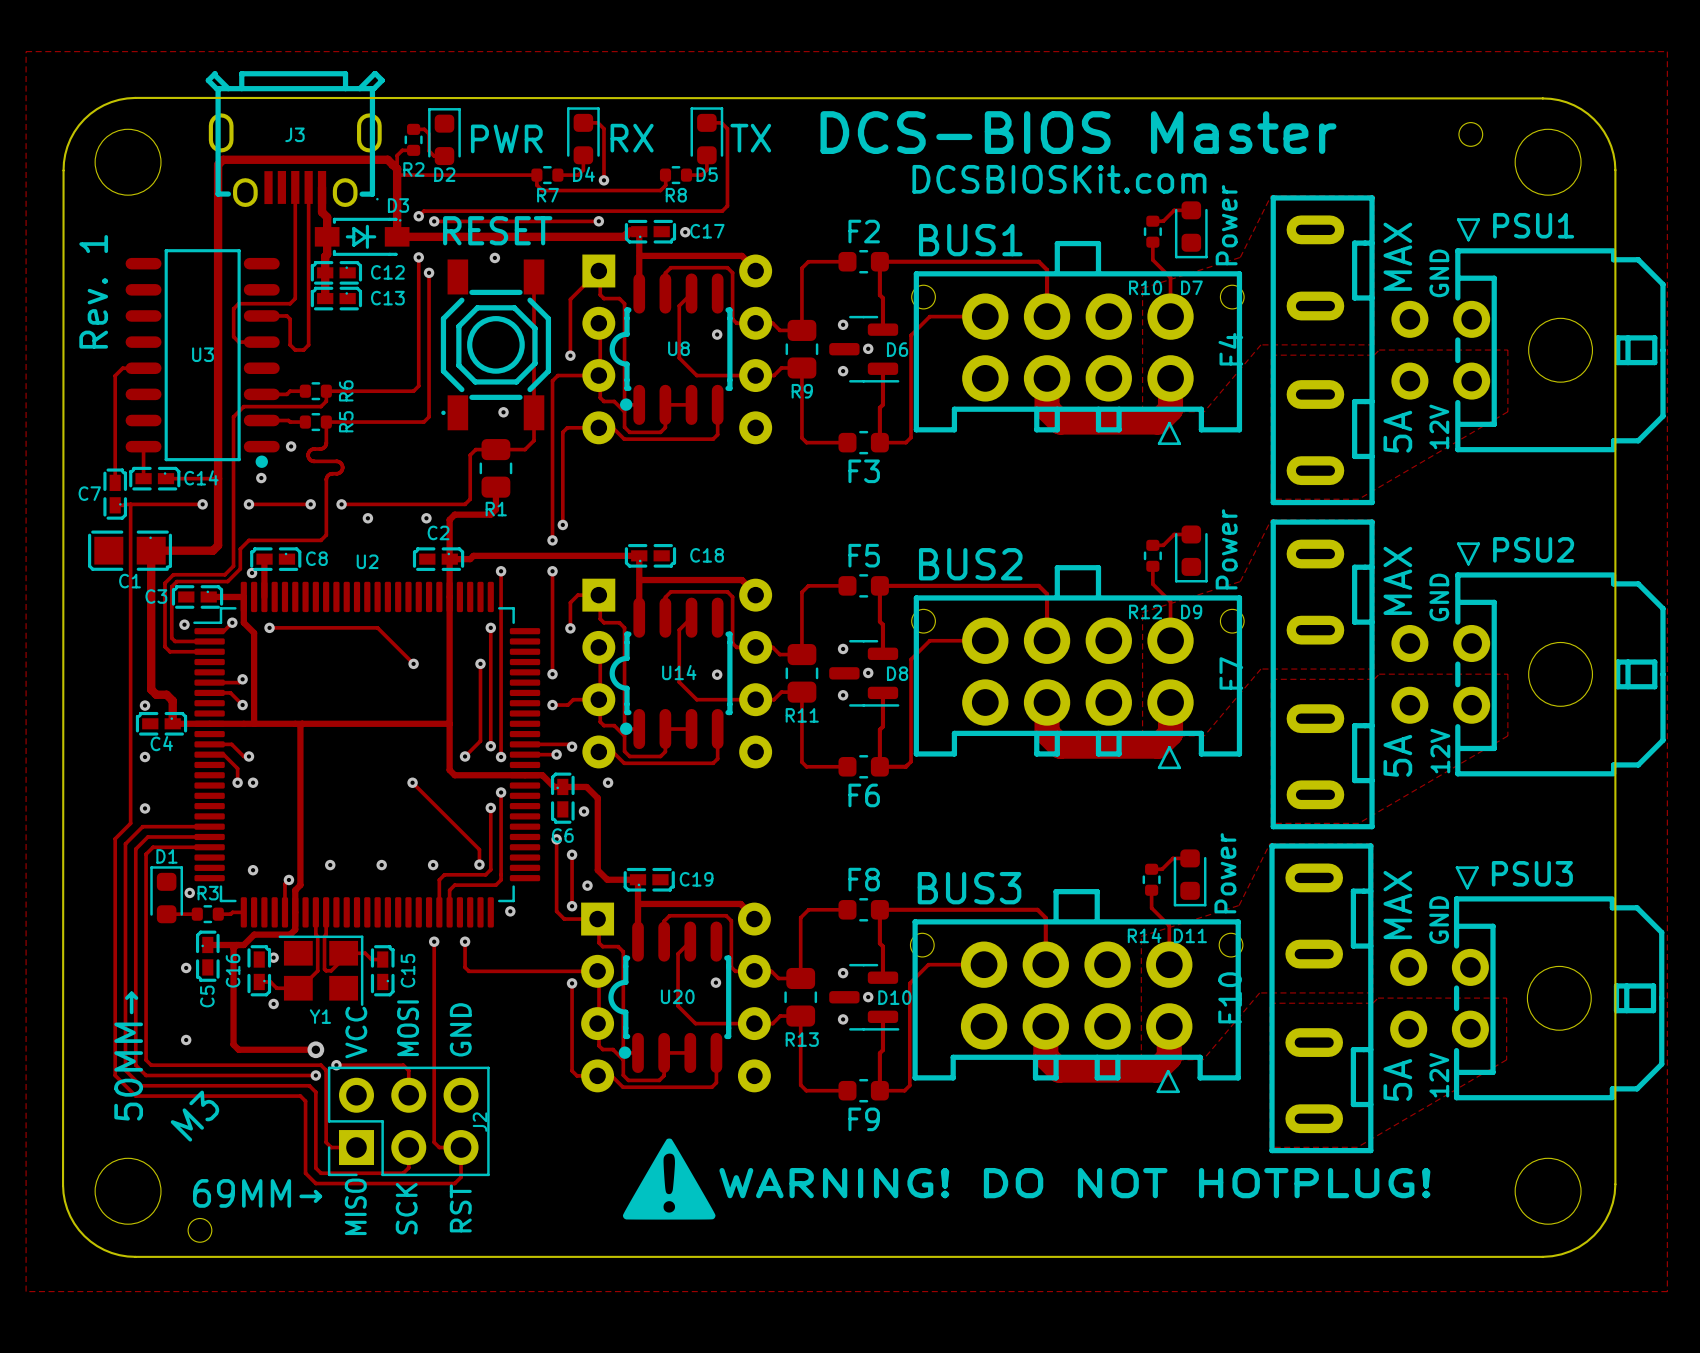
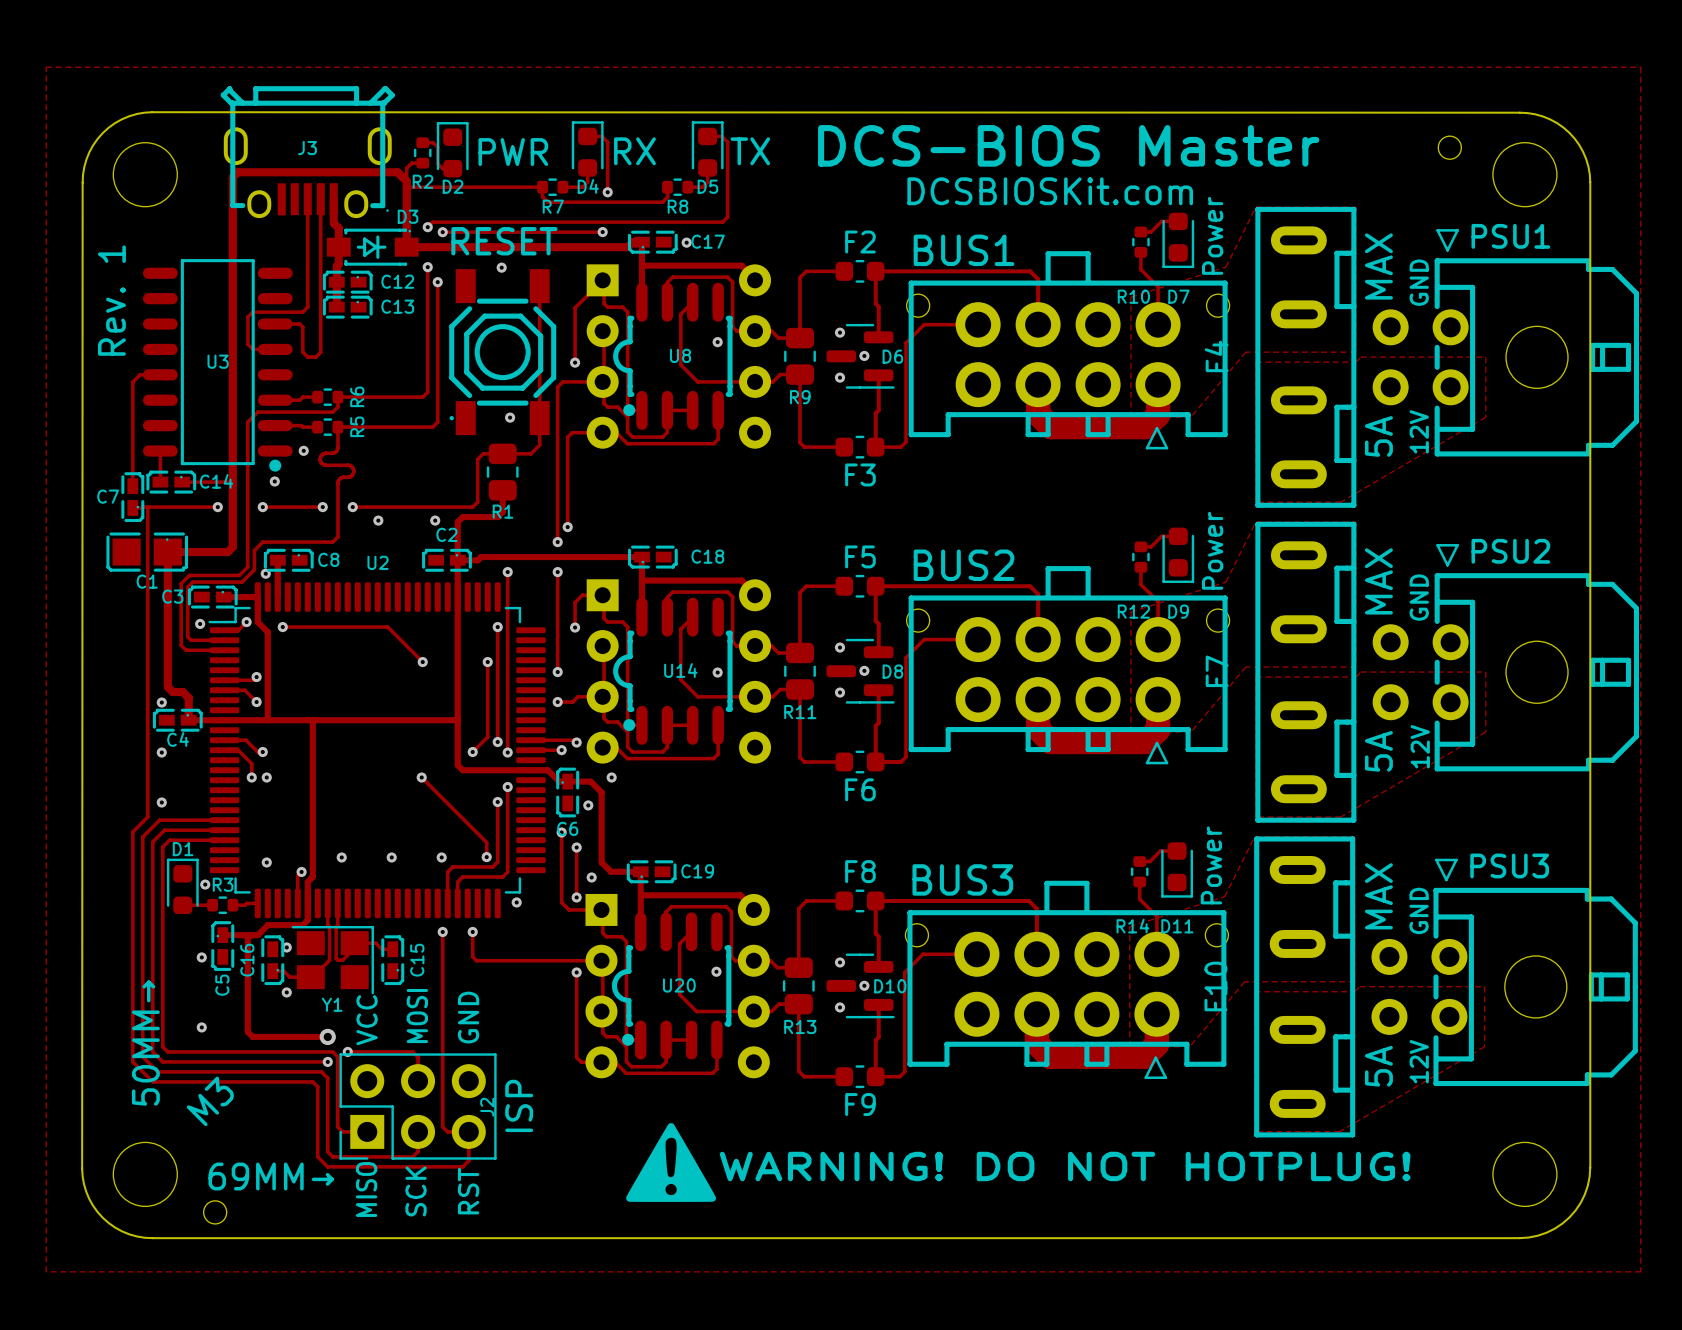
J2 text: none -> ISP (519, 1105)

